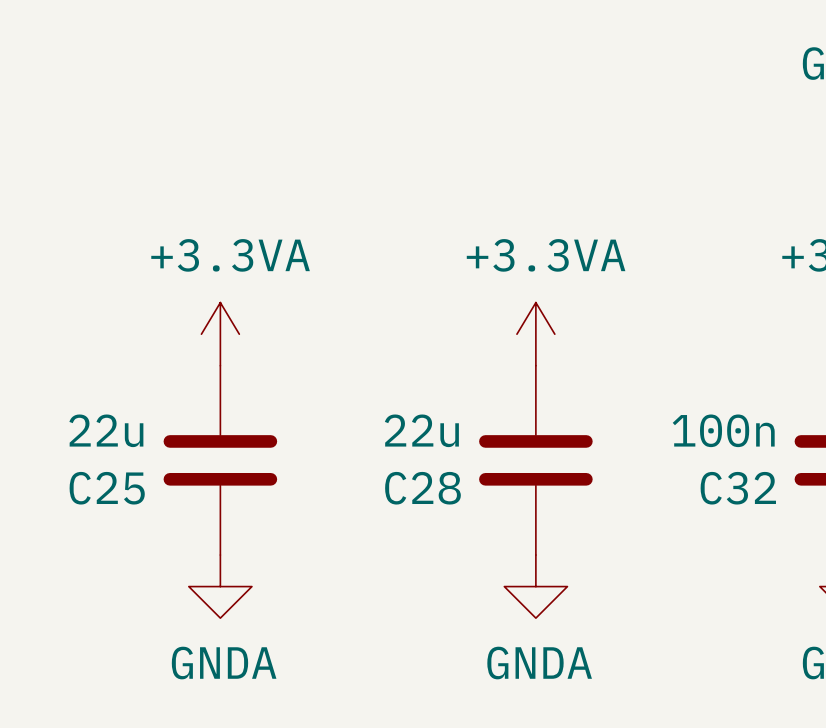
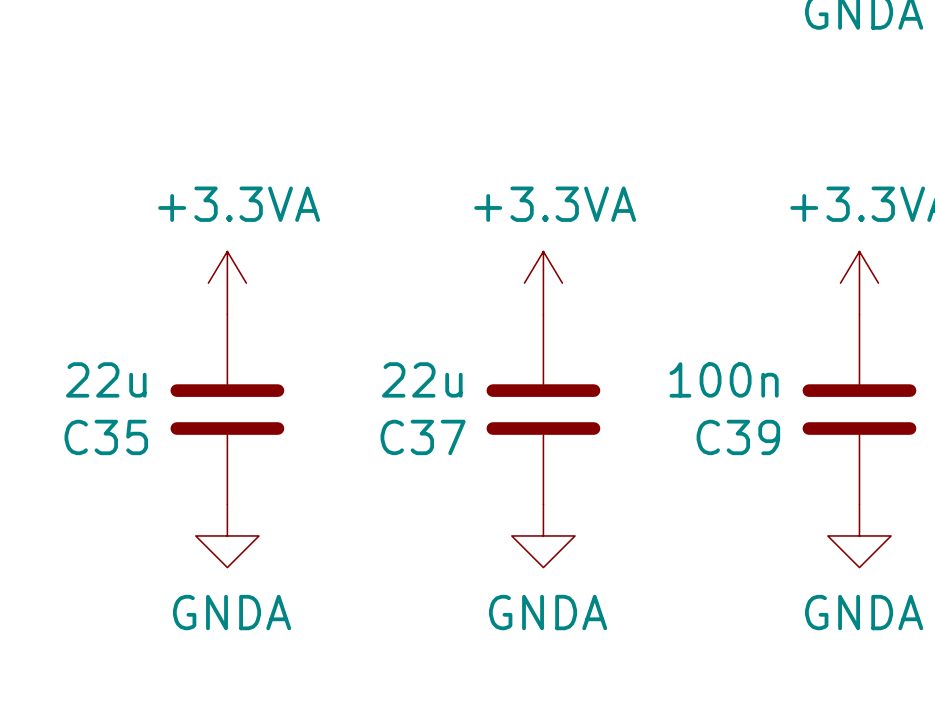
C25 name: C25 (107, 488) -> C35 (106, 437)
C28 name: C28 (422, 488) -> C37 (423, 437)
C32 name: C32 (738, 488) -> C39 (738, 437)

